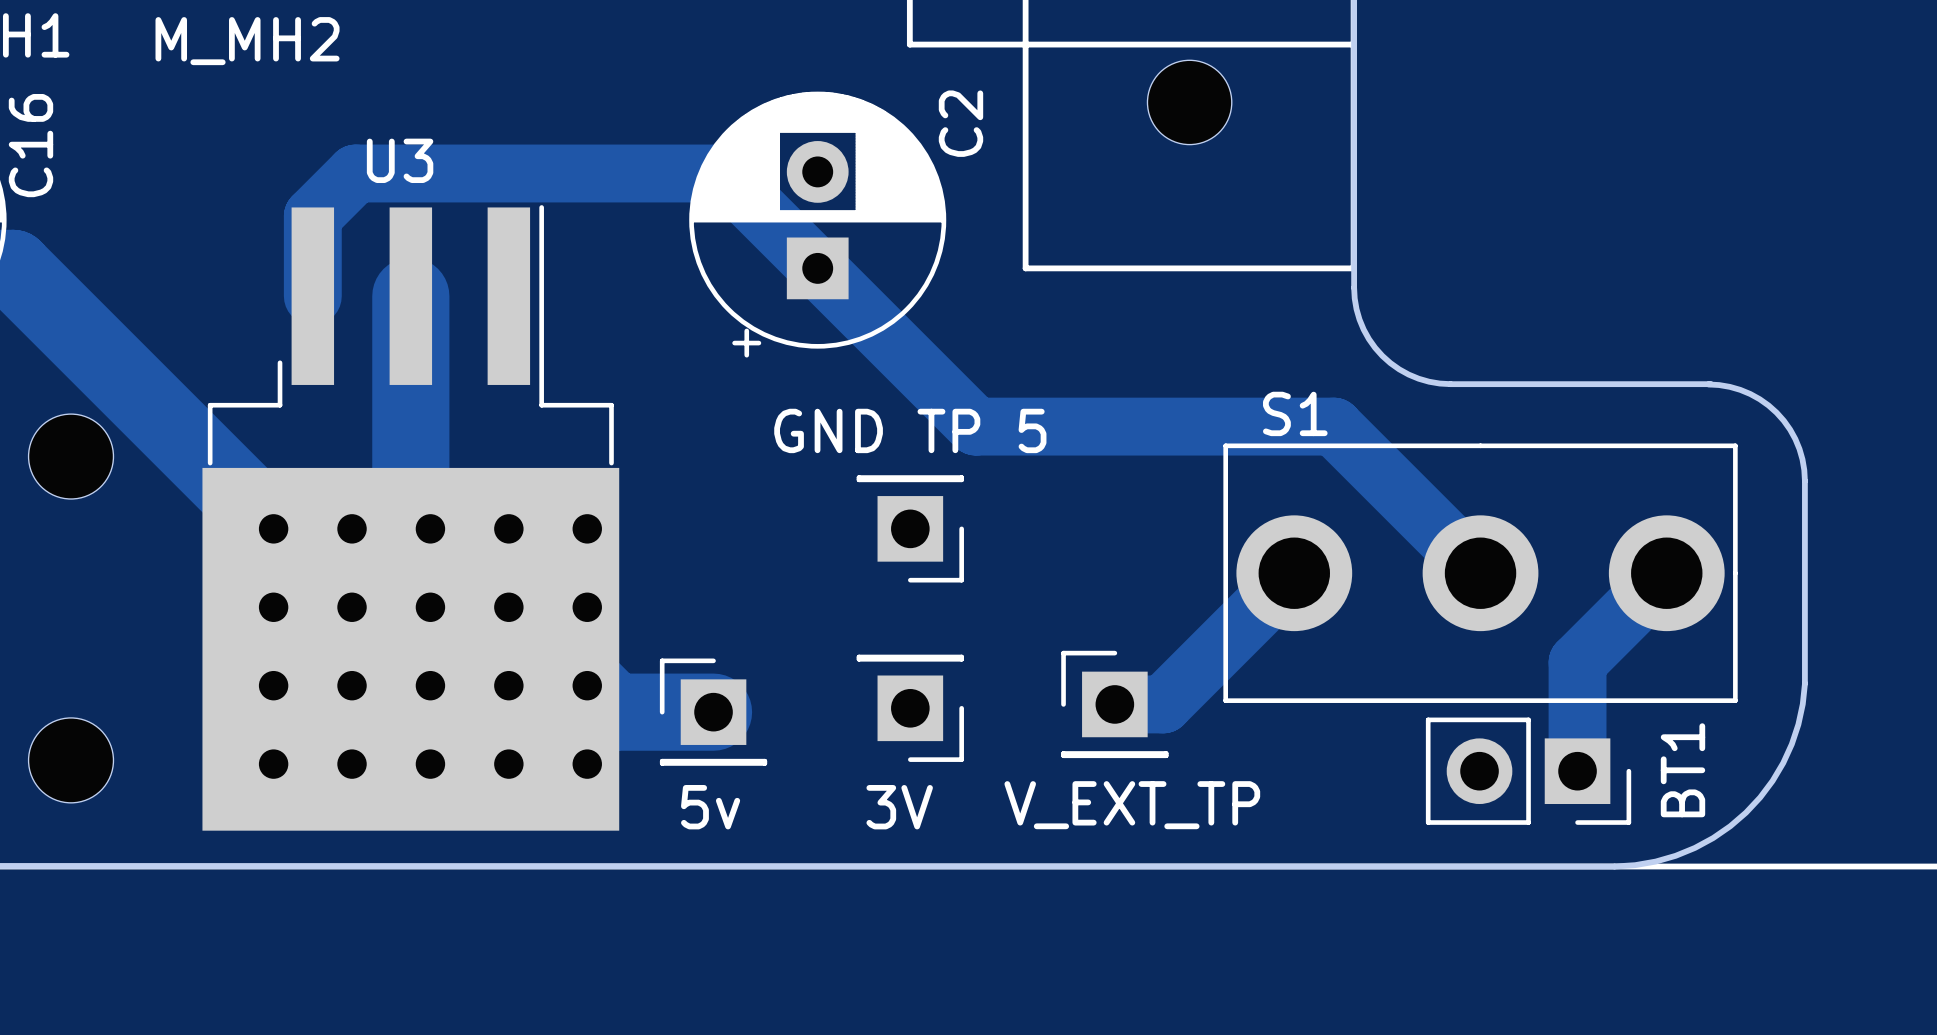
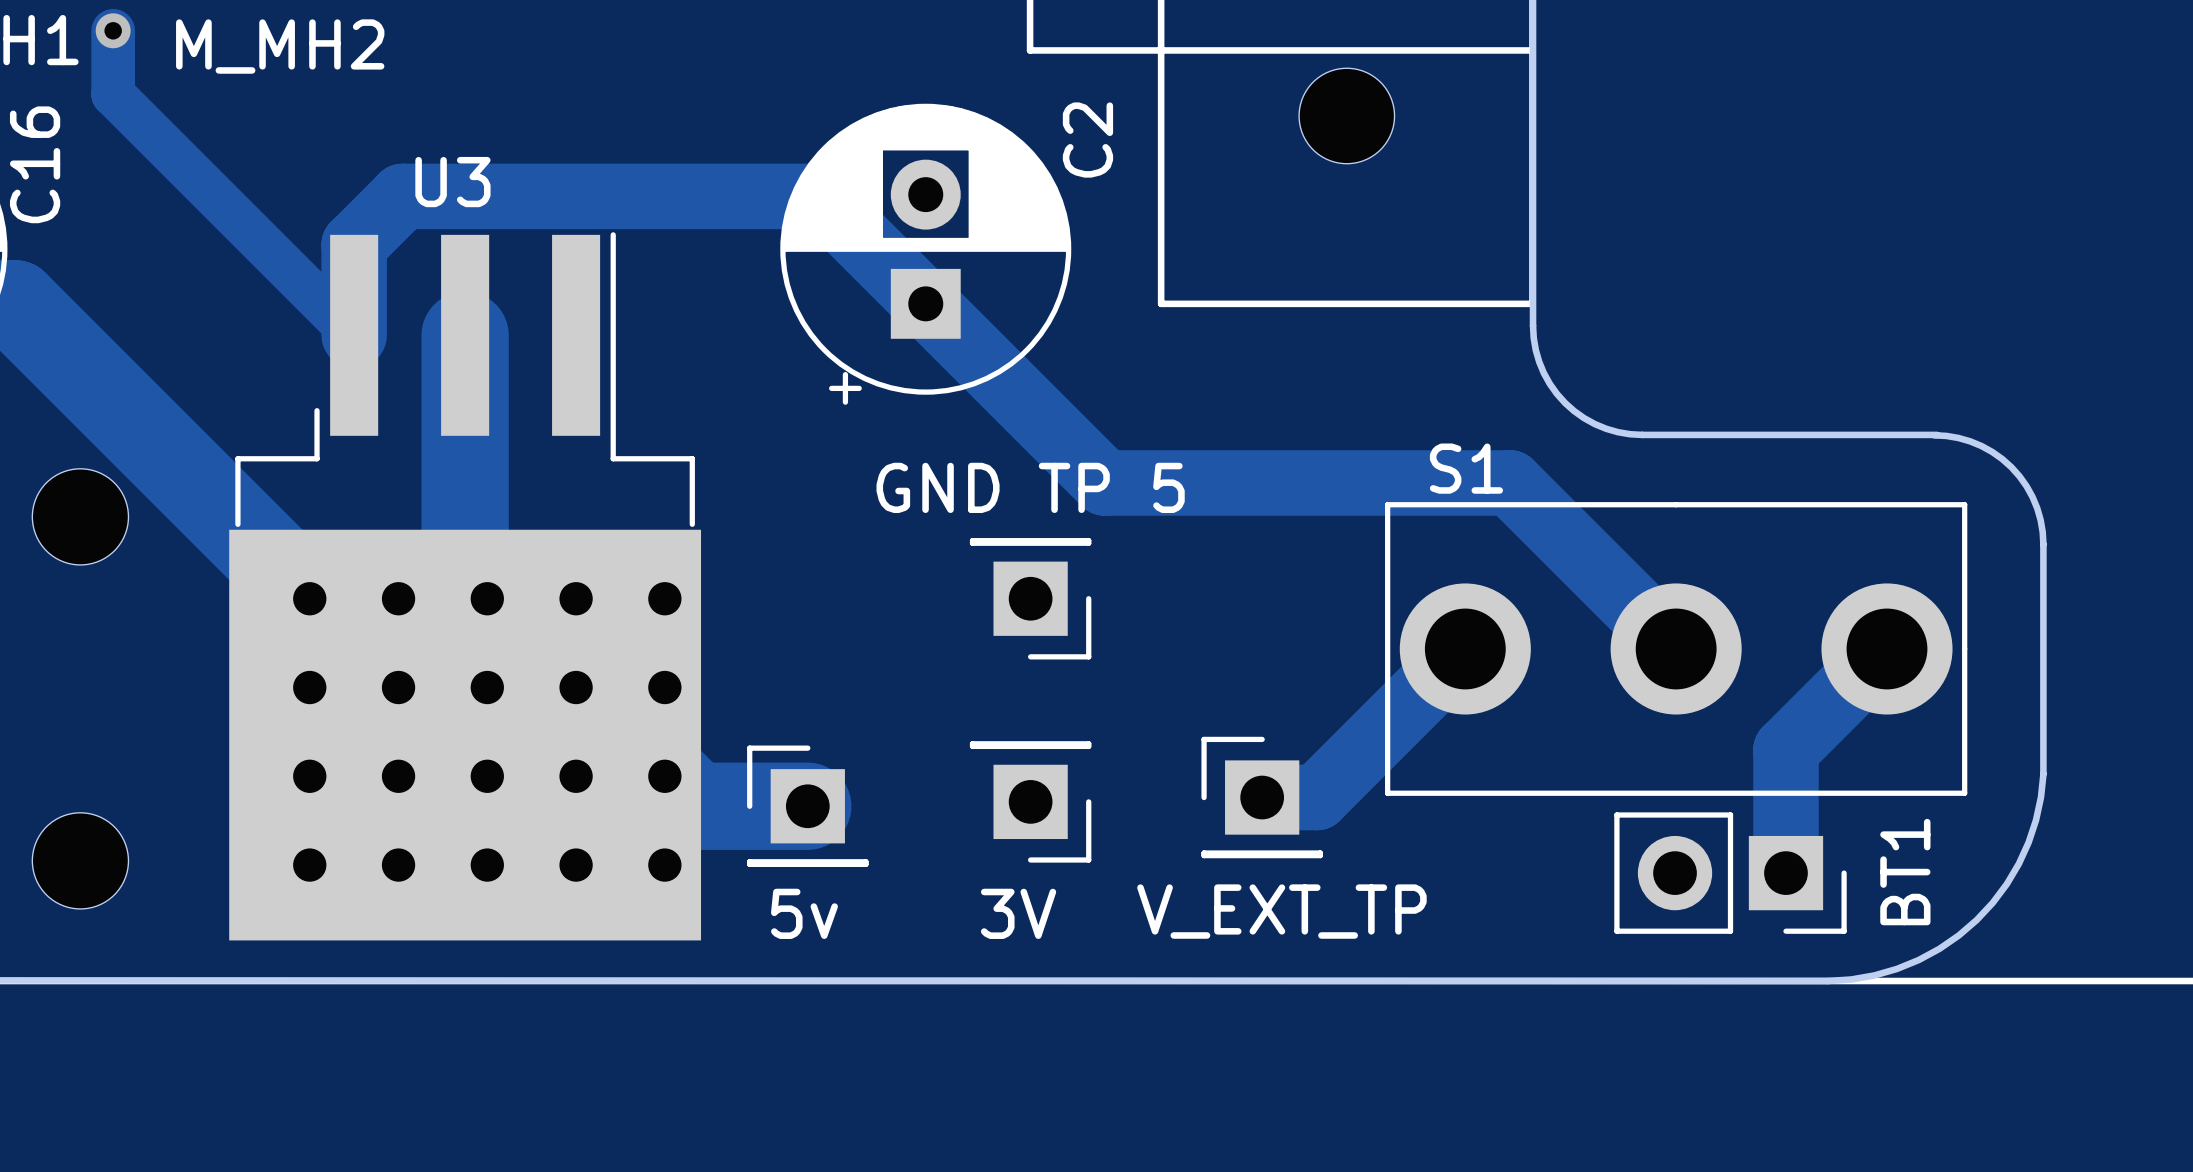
track: none -> (113, 30) (113, 94) (354, 335)
via: none -> (113, 30)

